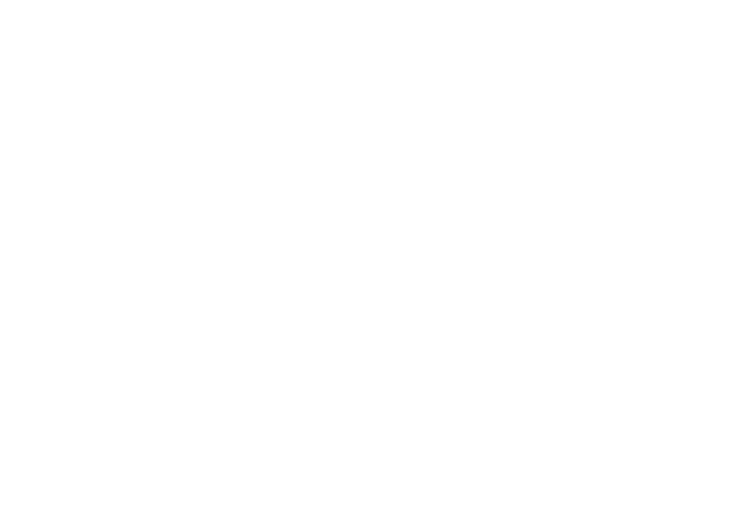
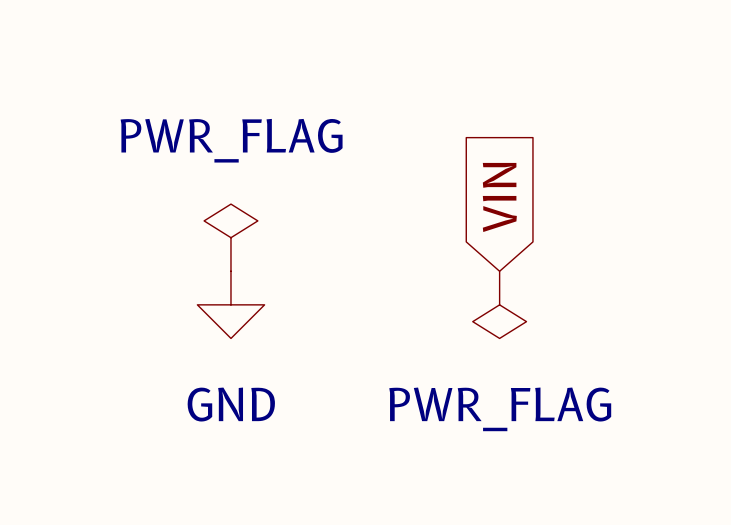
global label: none -> VIN (499, 197)
power symbol: none -> PWR_FLAG (230, 237)
power symbol: none -> GND (230, 304)
power symbol: none -> PWR_FLAG (499, 304)

